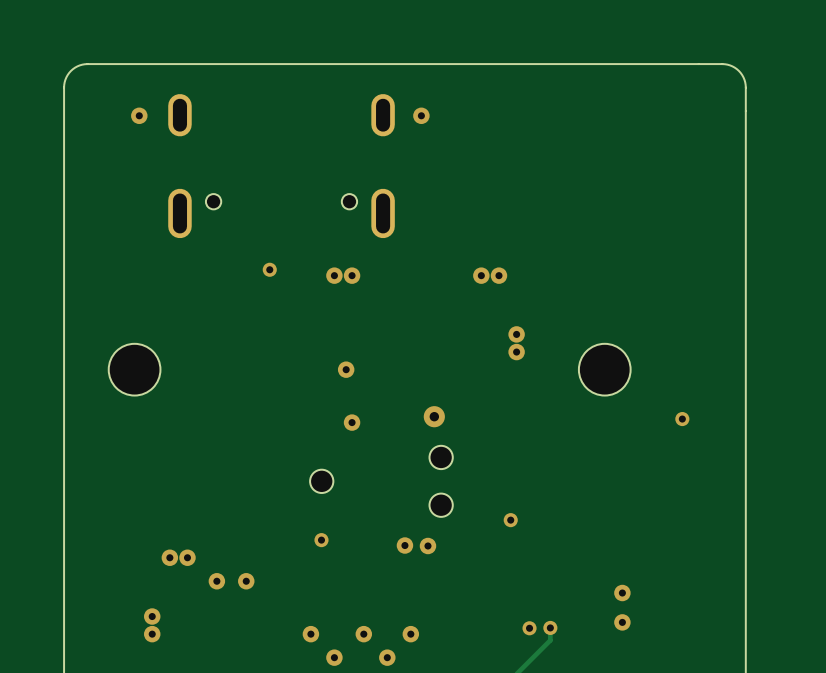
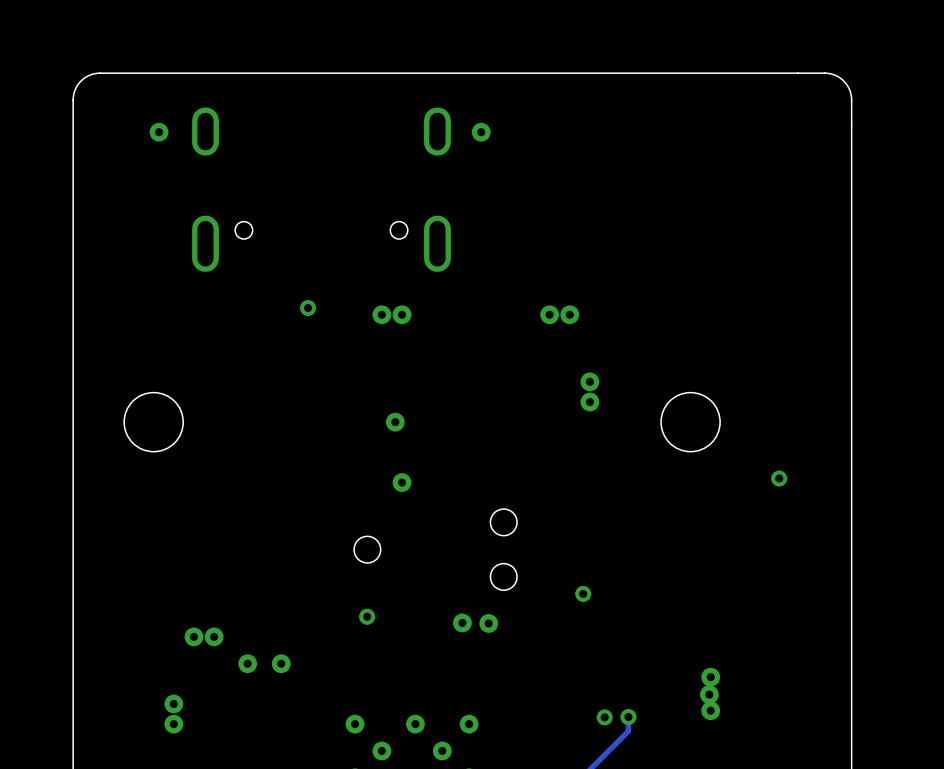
via: (434, 416) -> none
via: none -> (709, 694)

